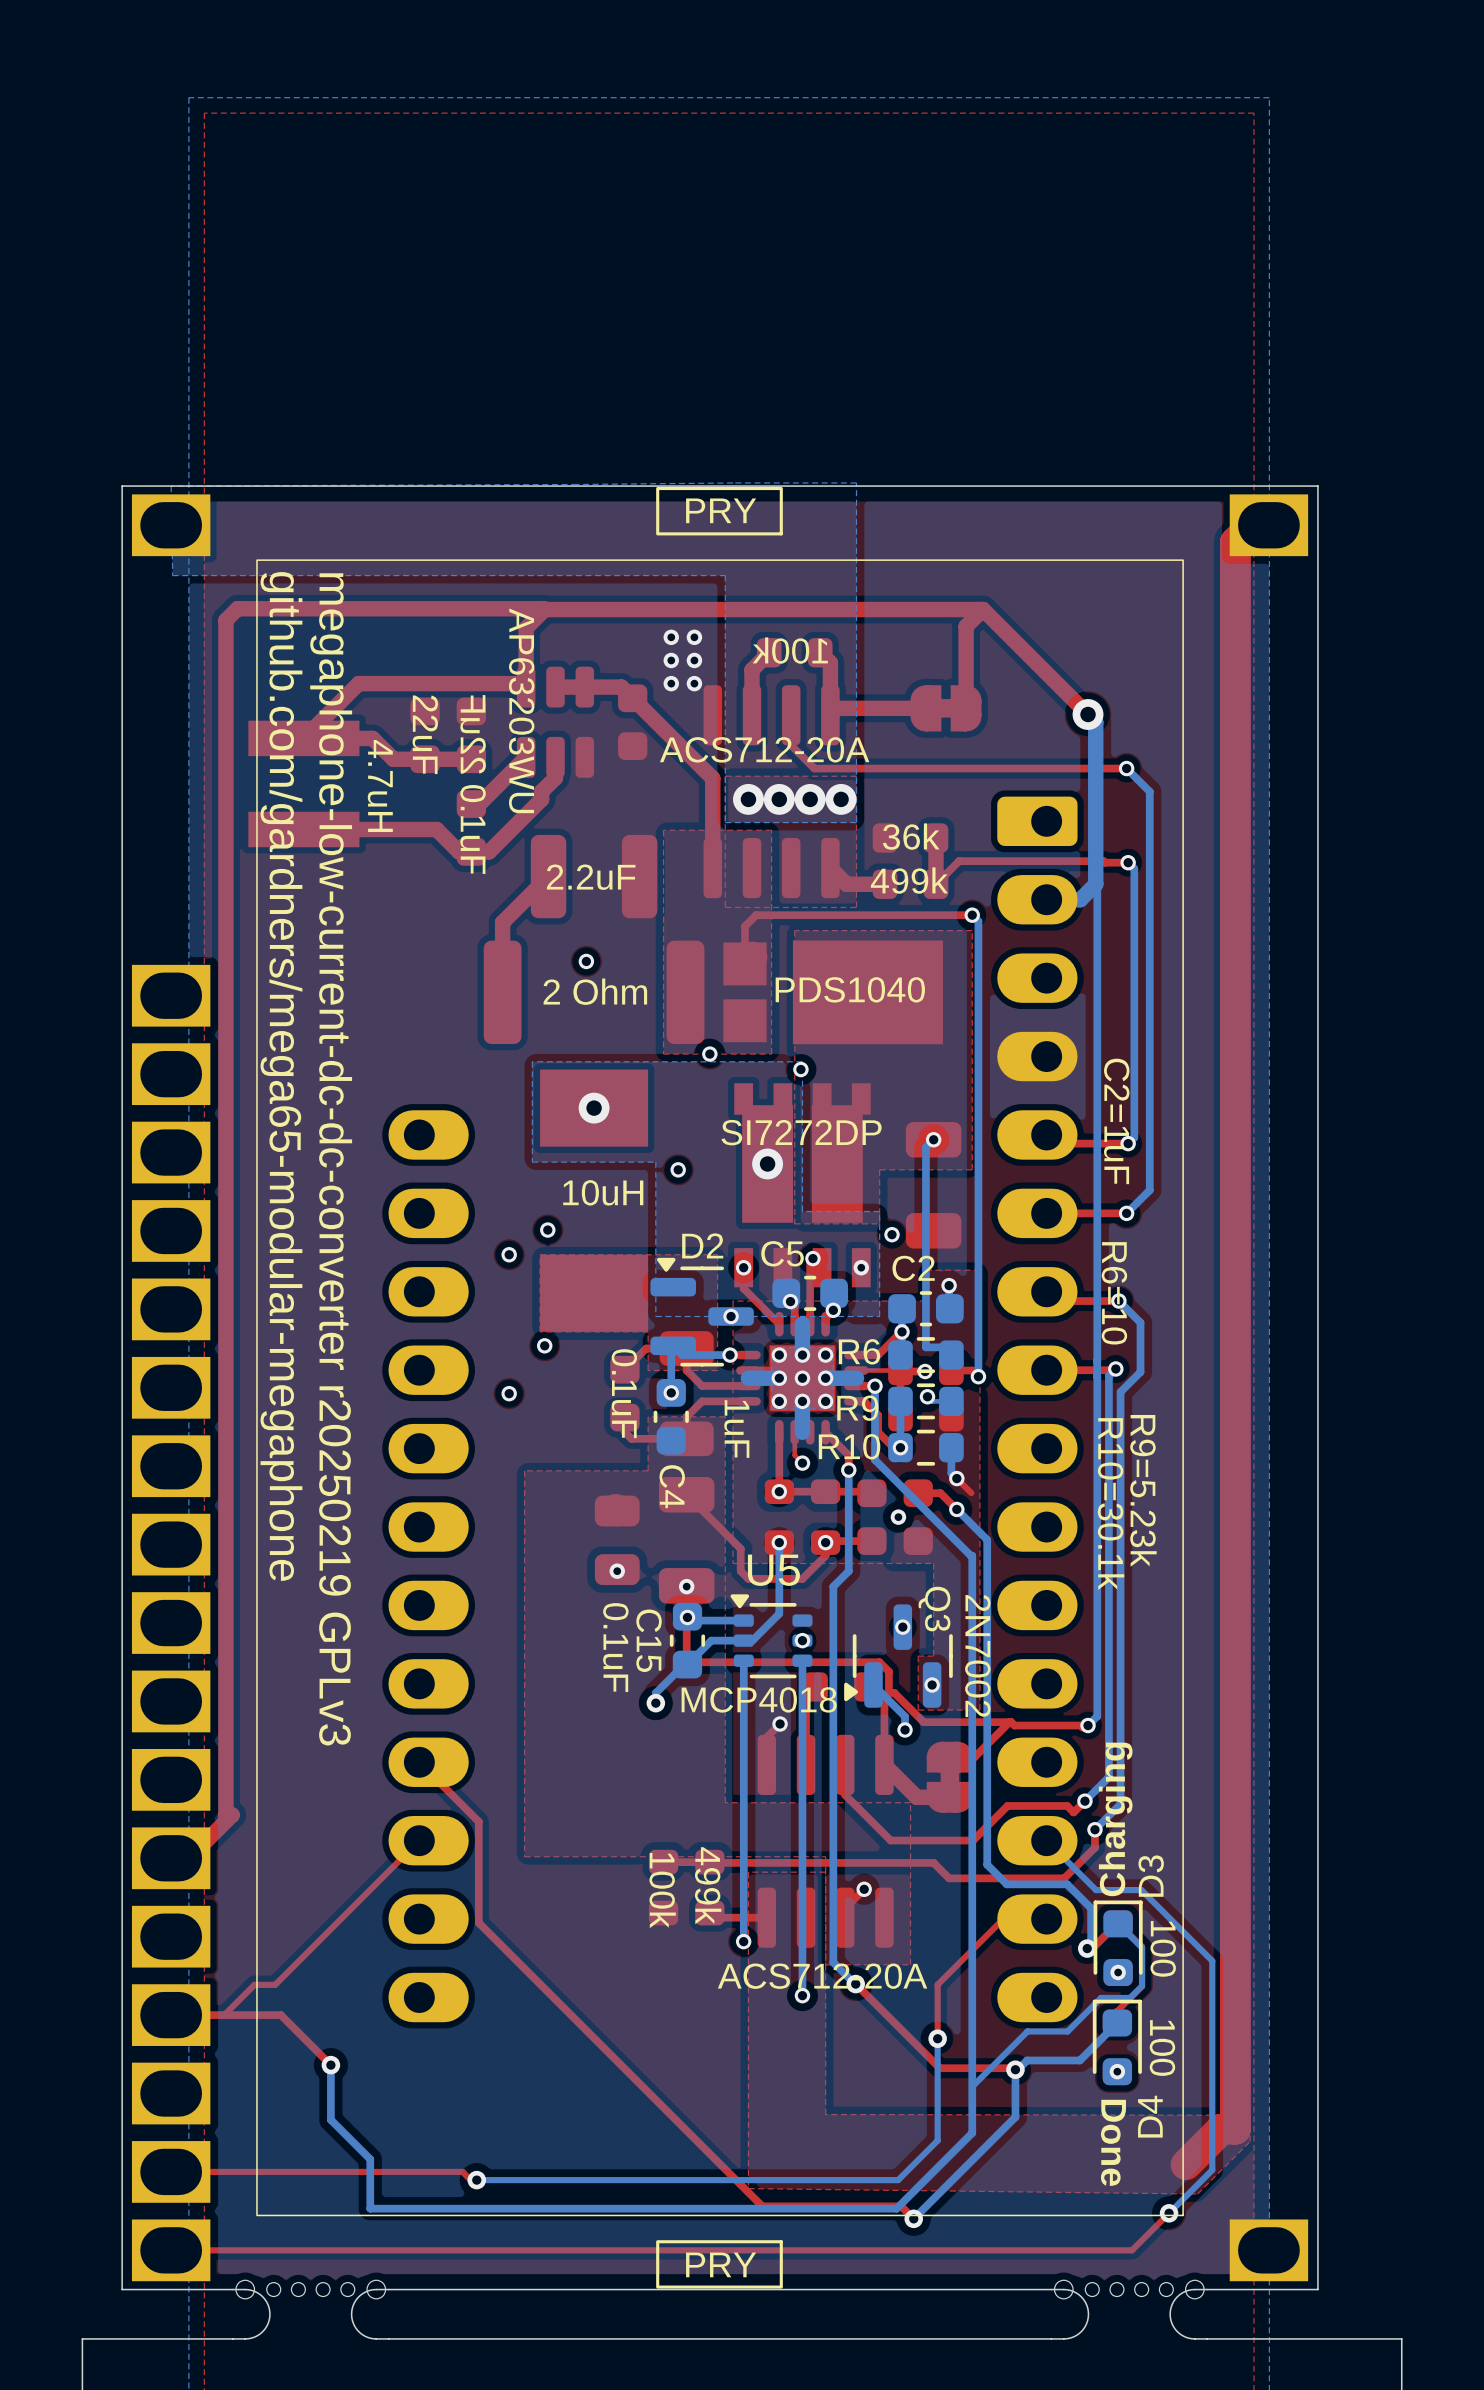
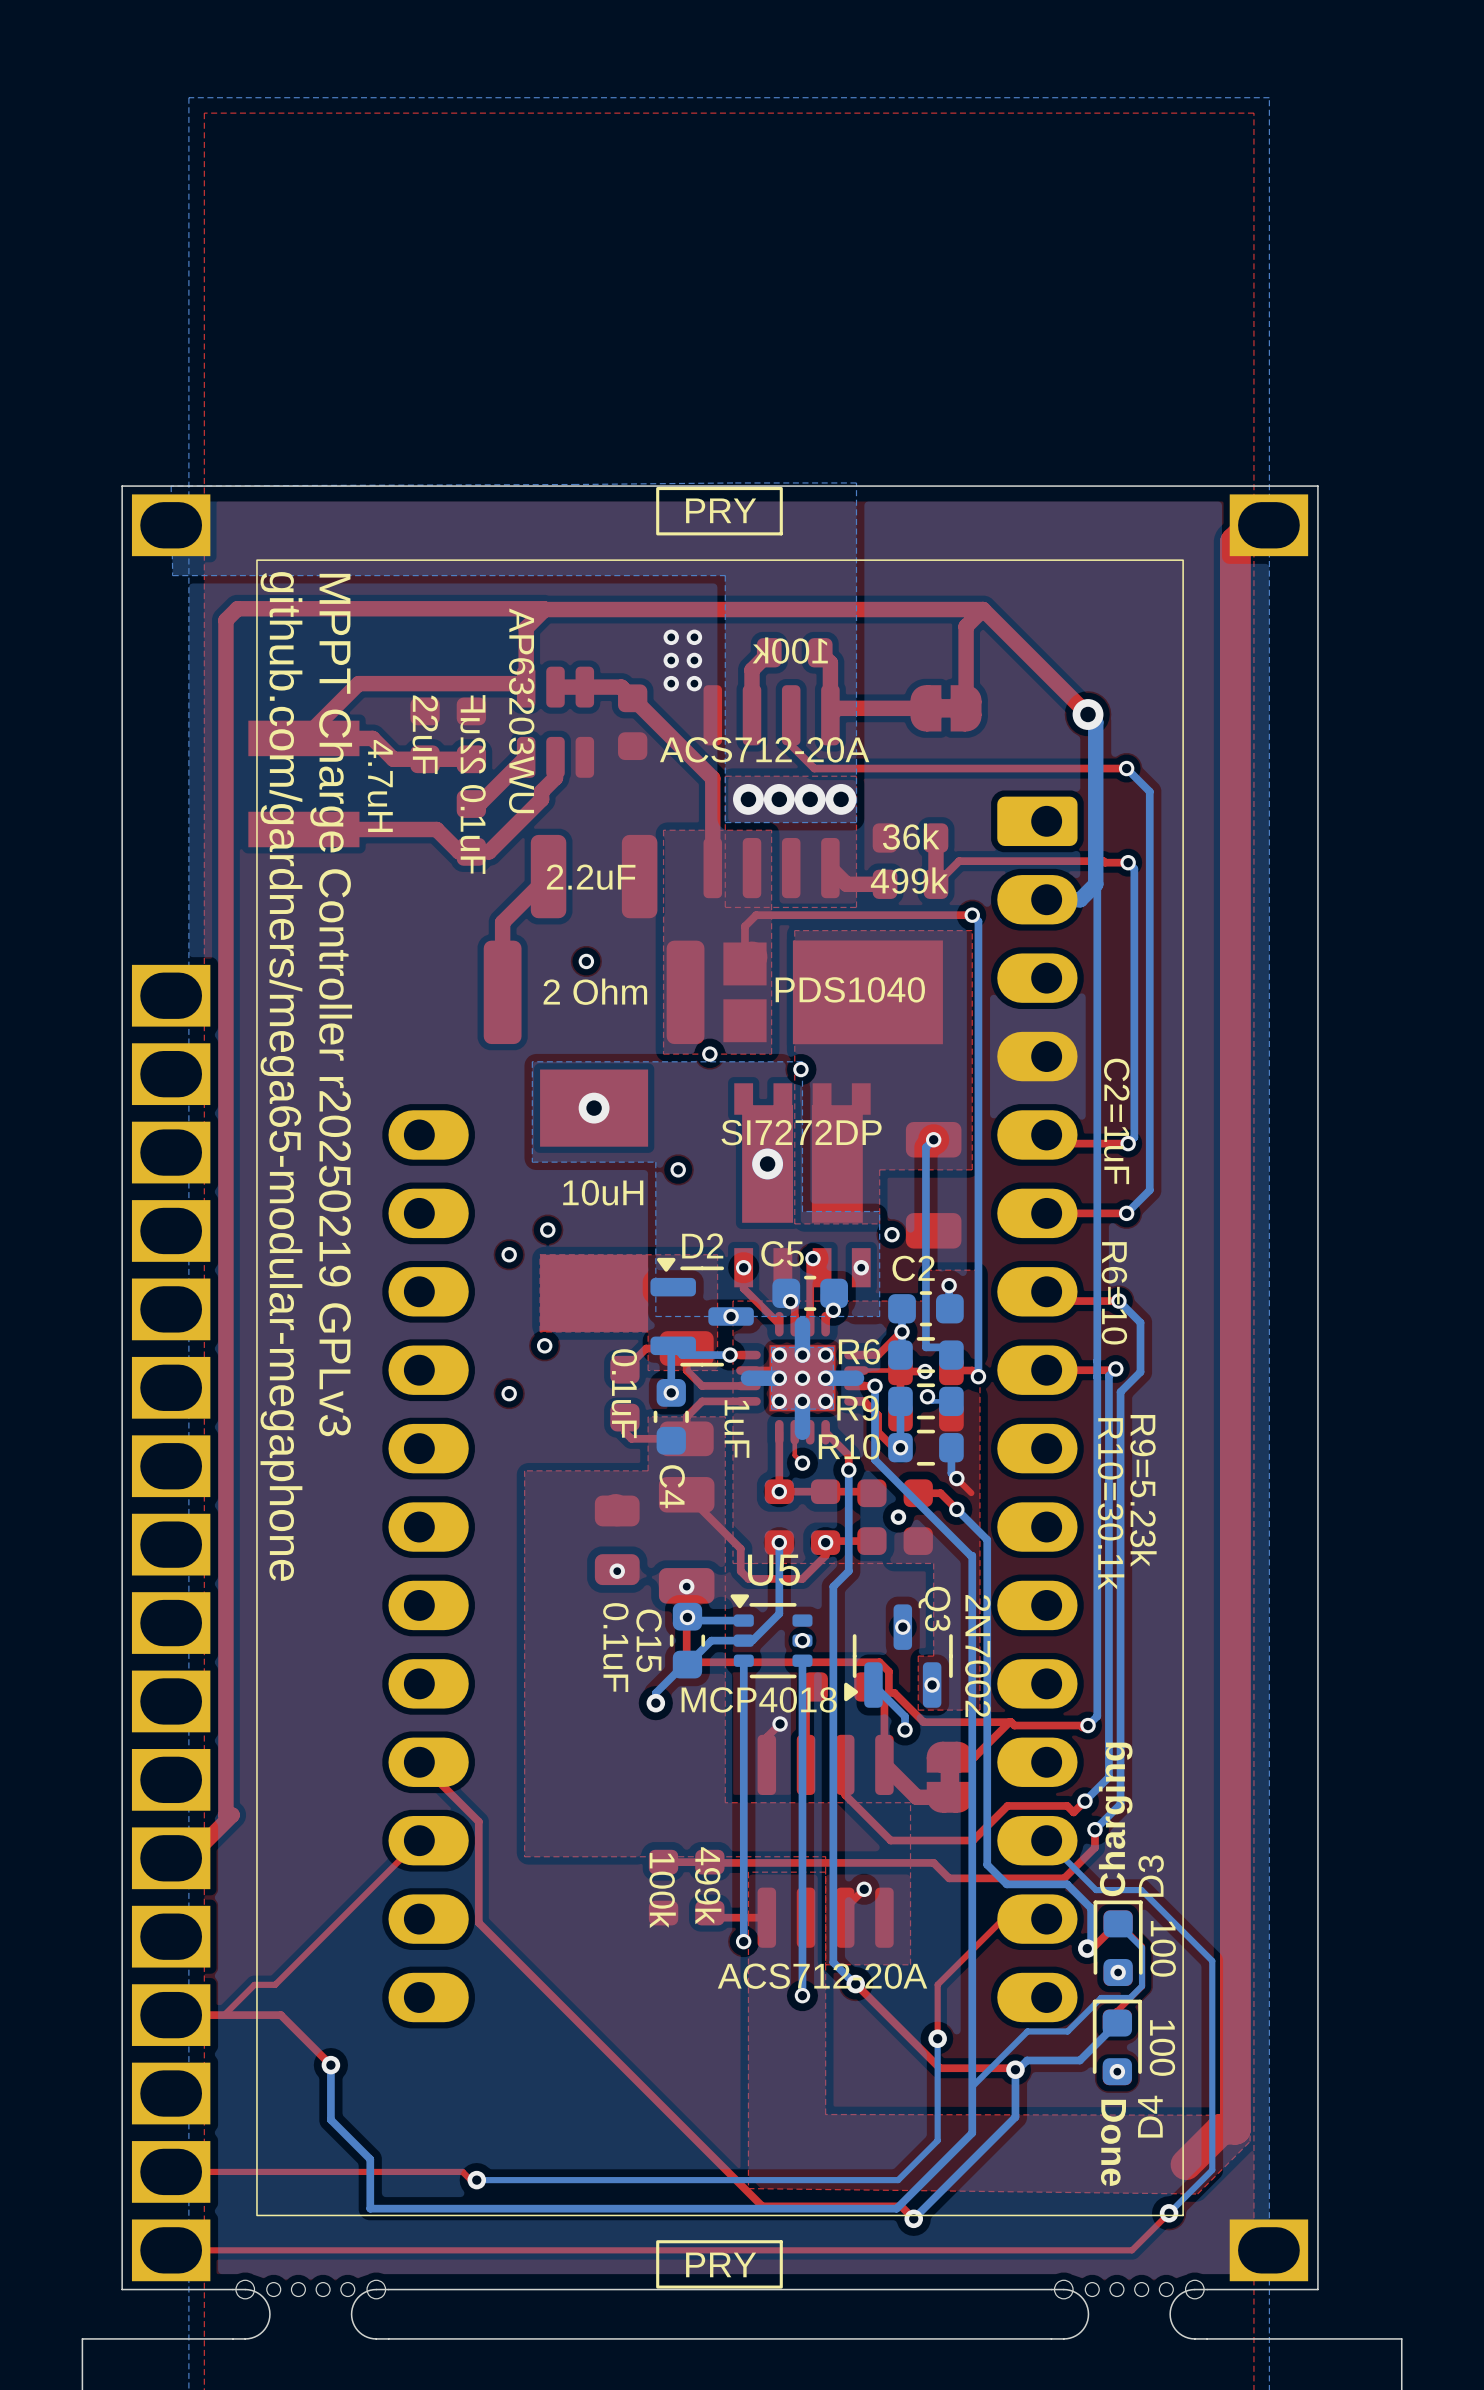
text: megaphone-low-current-dc-dc-converter r20250219 GPLv3 (331, 1159) -> MPPT Charge Controller r20250219 GPLv3 (331, 1005)

